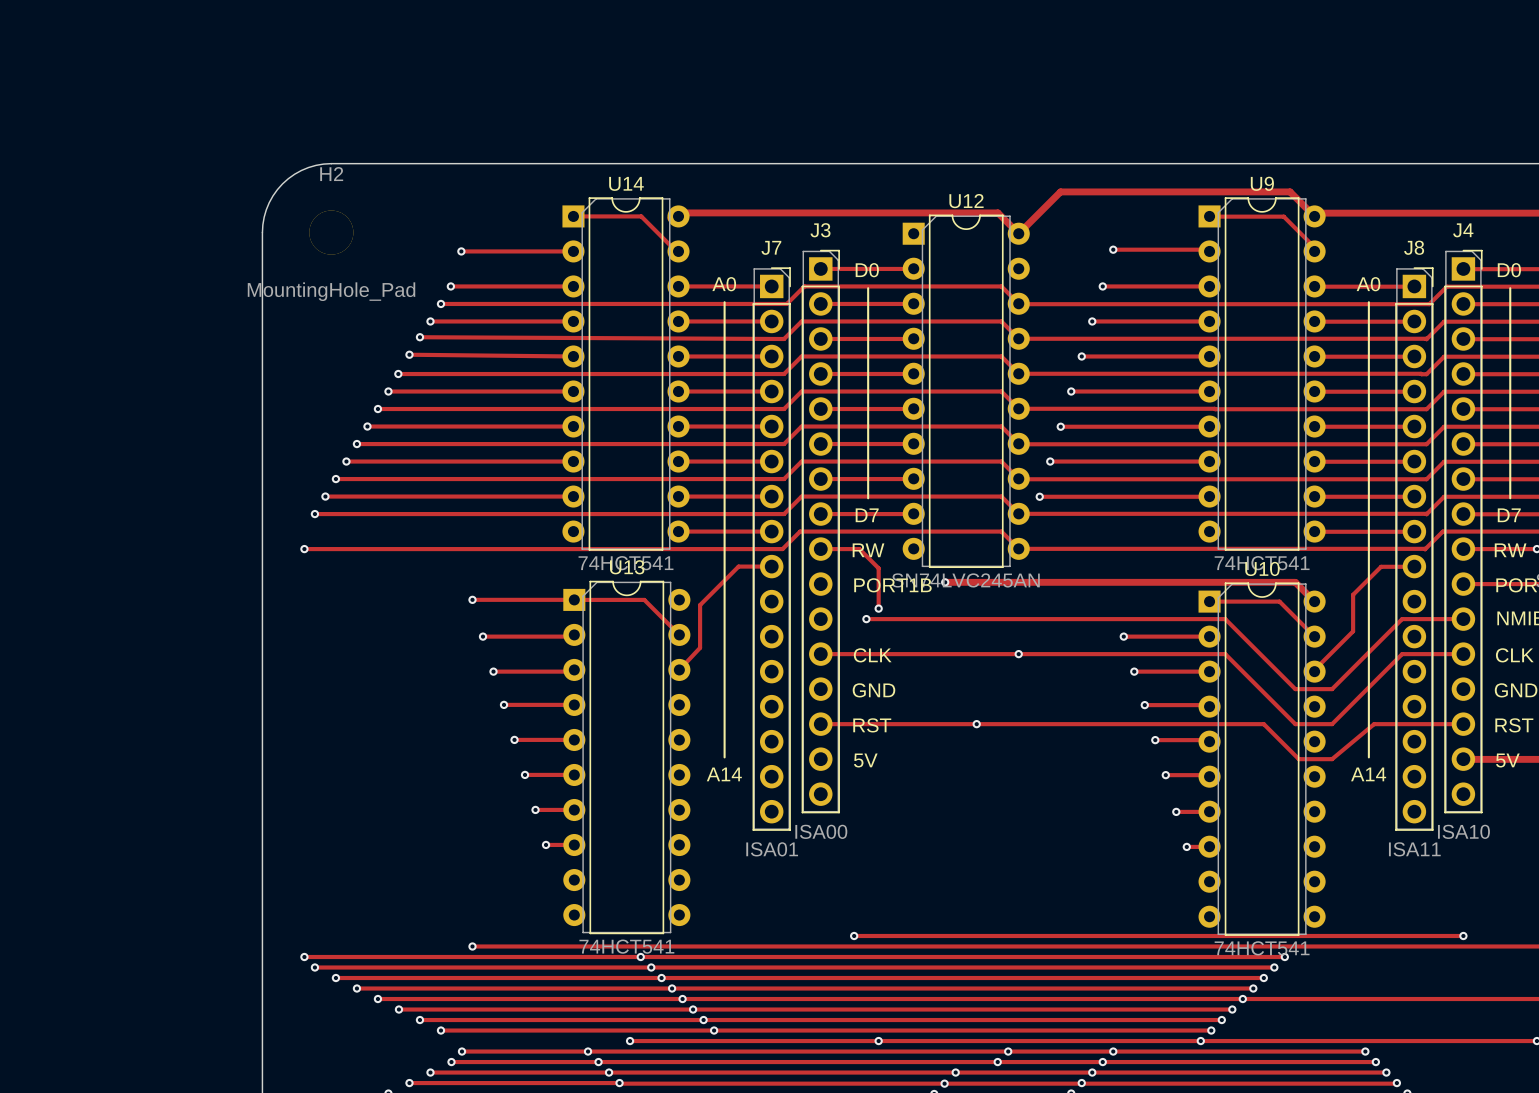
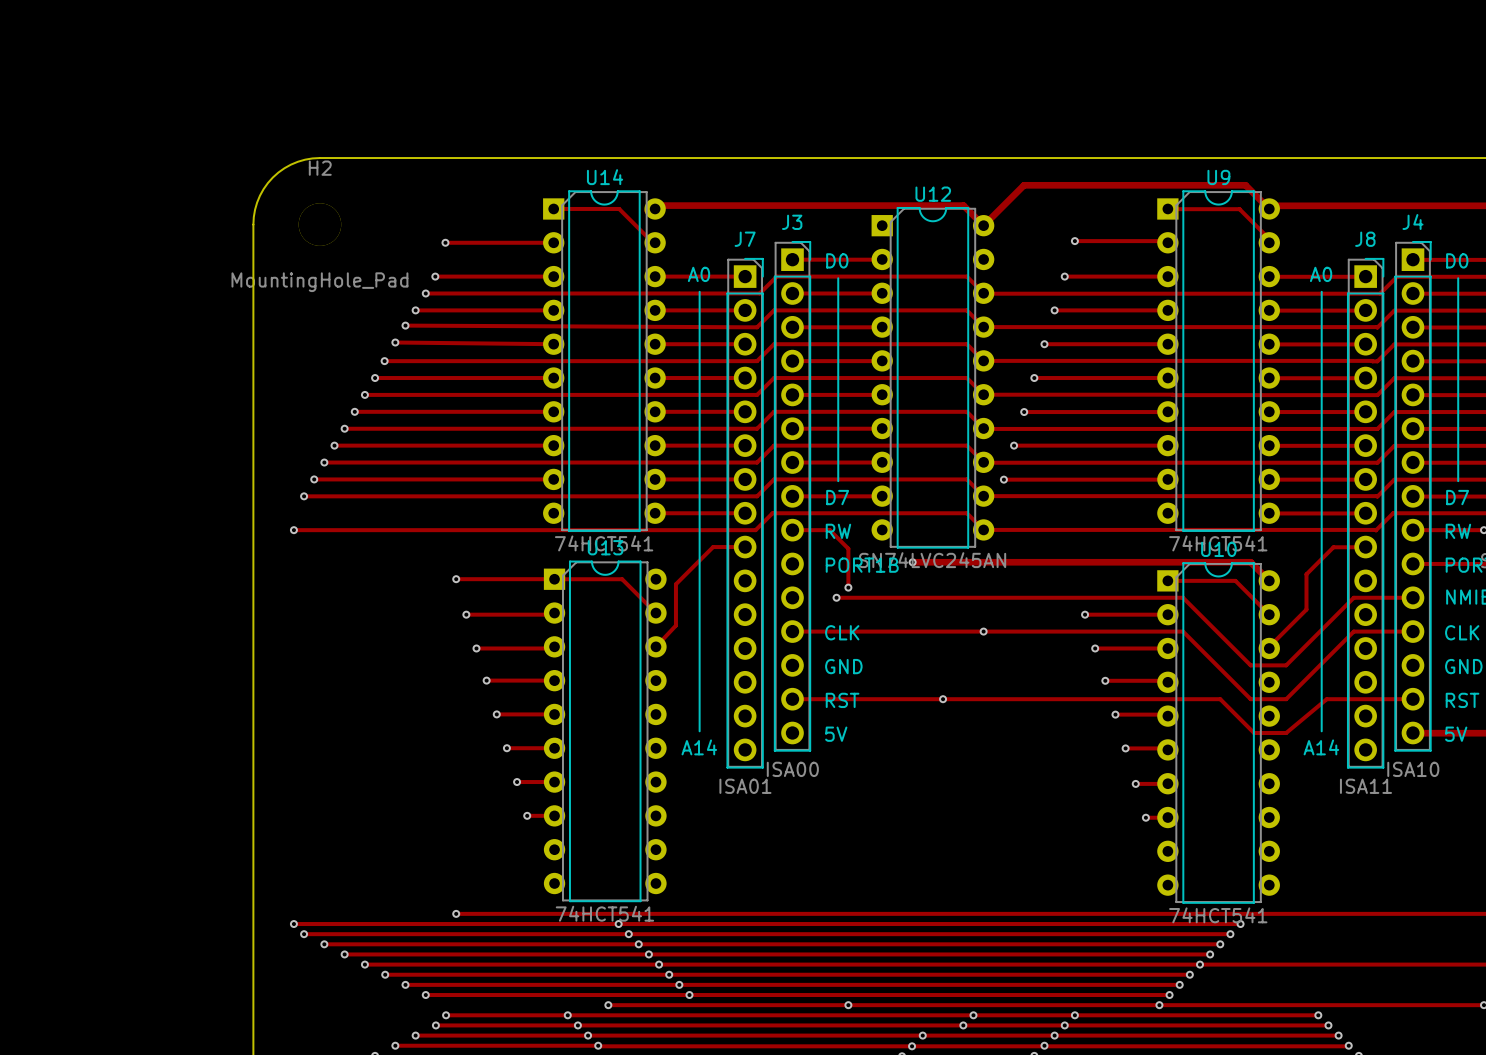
J3 footprint: [801, 249, 840, 814] -> [774, 241, 812, 752]
J4 footprint: [1444, 249, 1483, 814] -> [1394, 241, 1432, 752]
J7 footprint: [752, 267, 791, 831] -> [726, 258, 764, 769]
J8 footprint: [1395, 267, 1434, 831] -> [1347, 258, 1385, 769]
track: (854, 935) (1463, 935) -> none
via: (854, 935) -> none
via: (1463, 935) -> none

